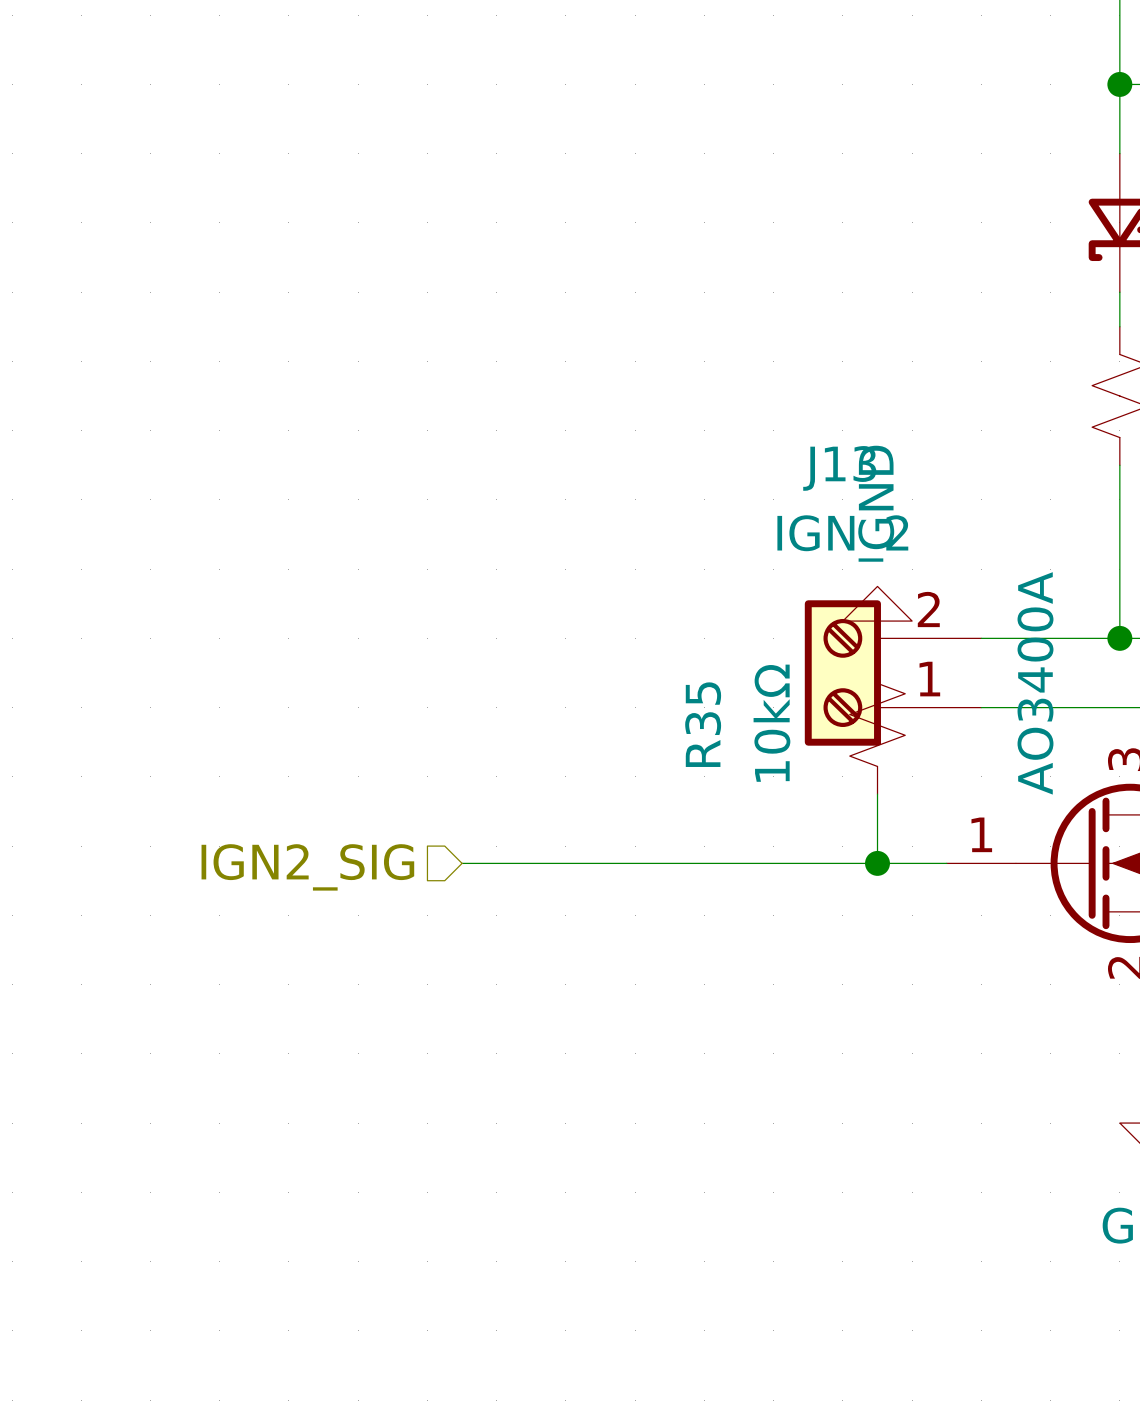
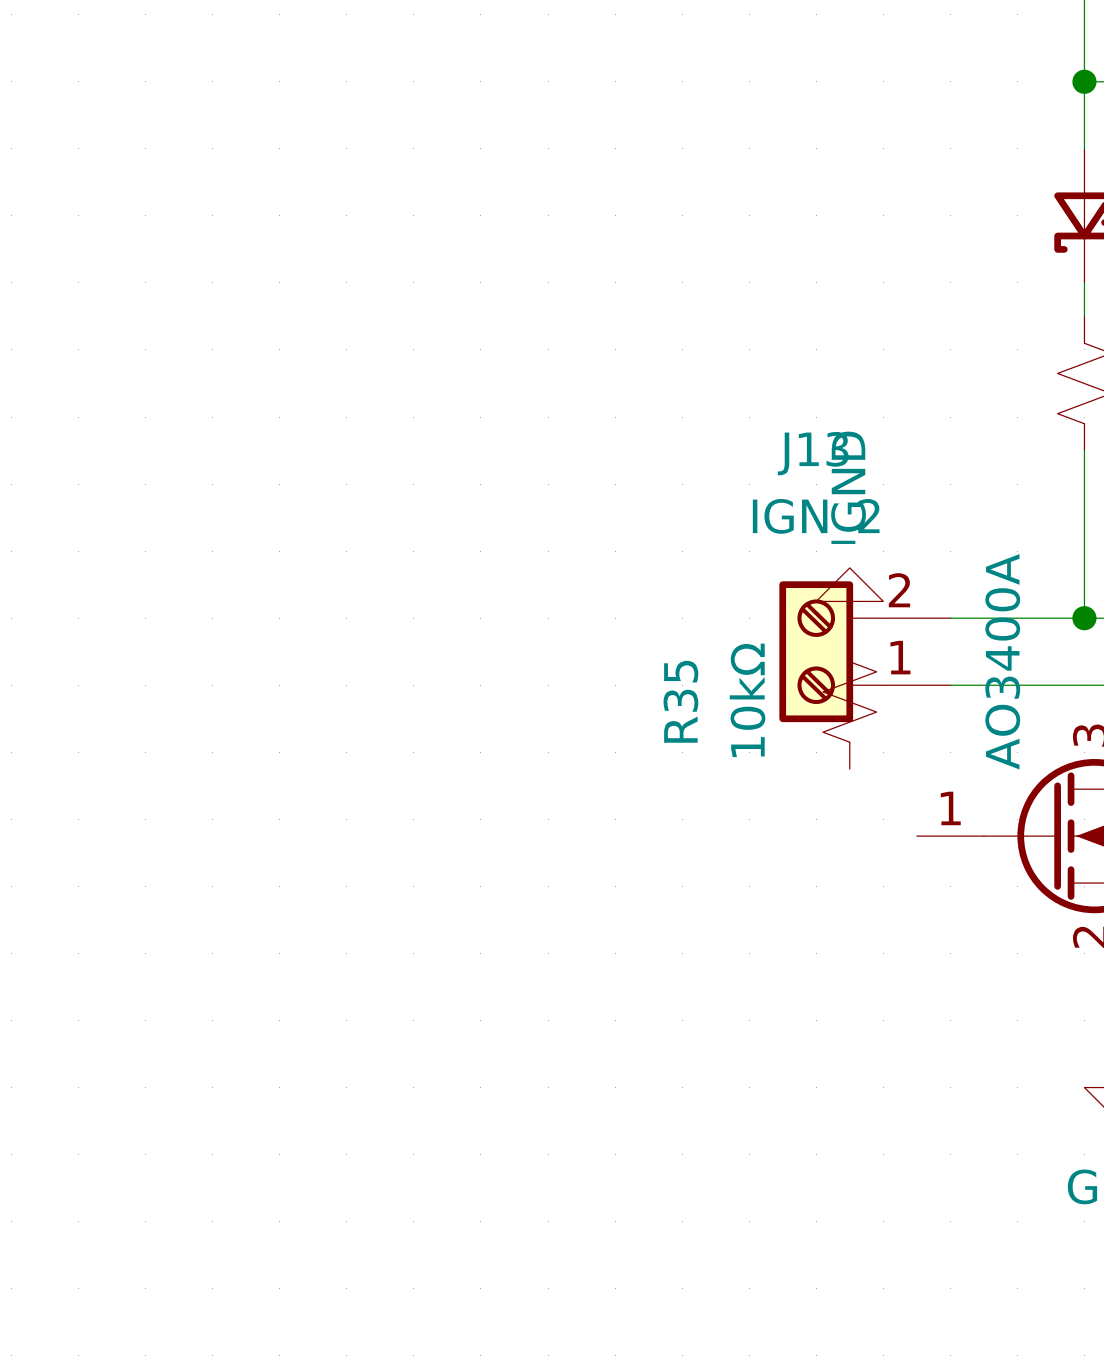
wire: (877, 794) (877, 863) -> none
wire: (462, 863) (946, 863) -> none
junction: (877, 863) -> none
hierarchical label: IGN2_SIG (307, 867) -> none

